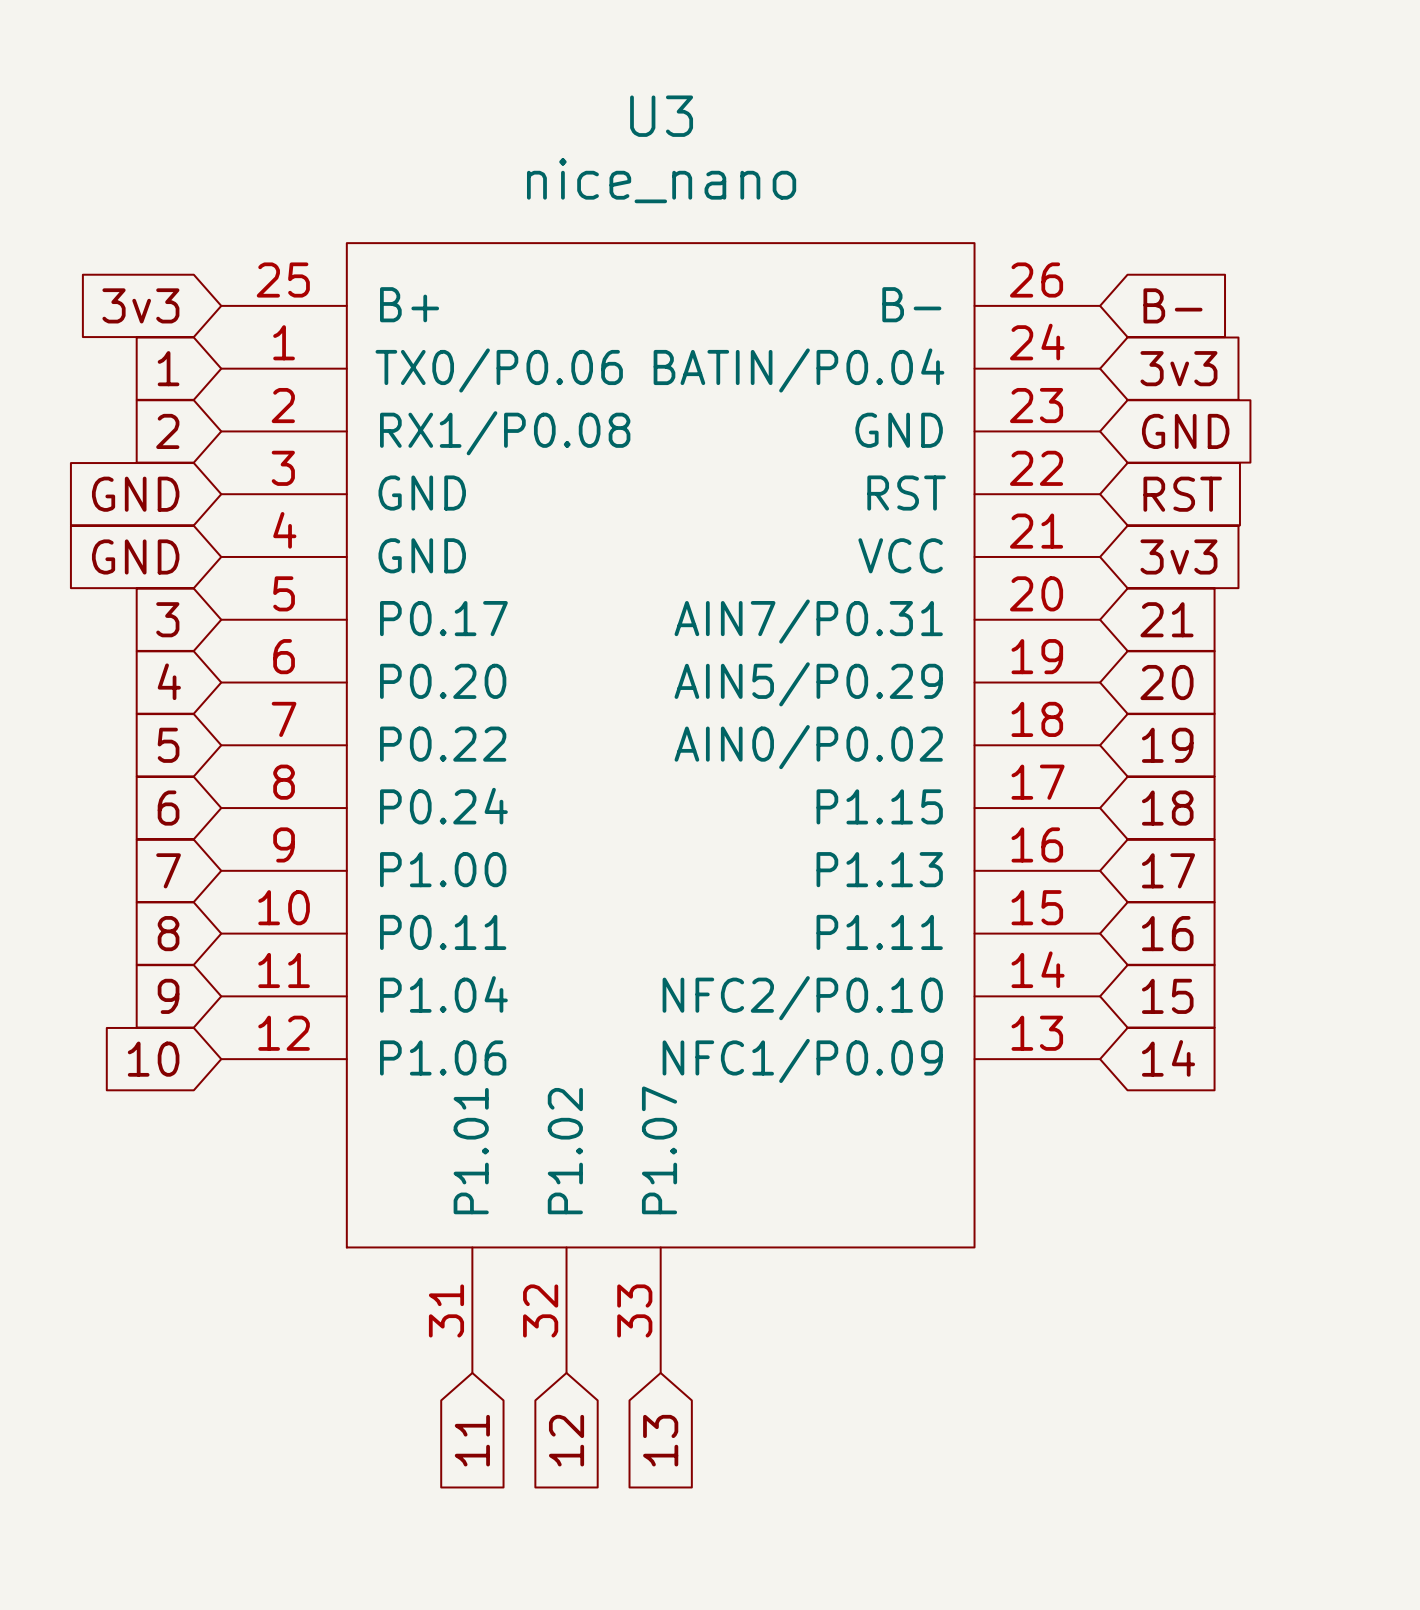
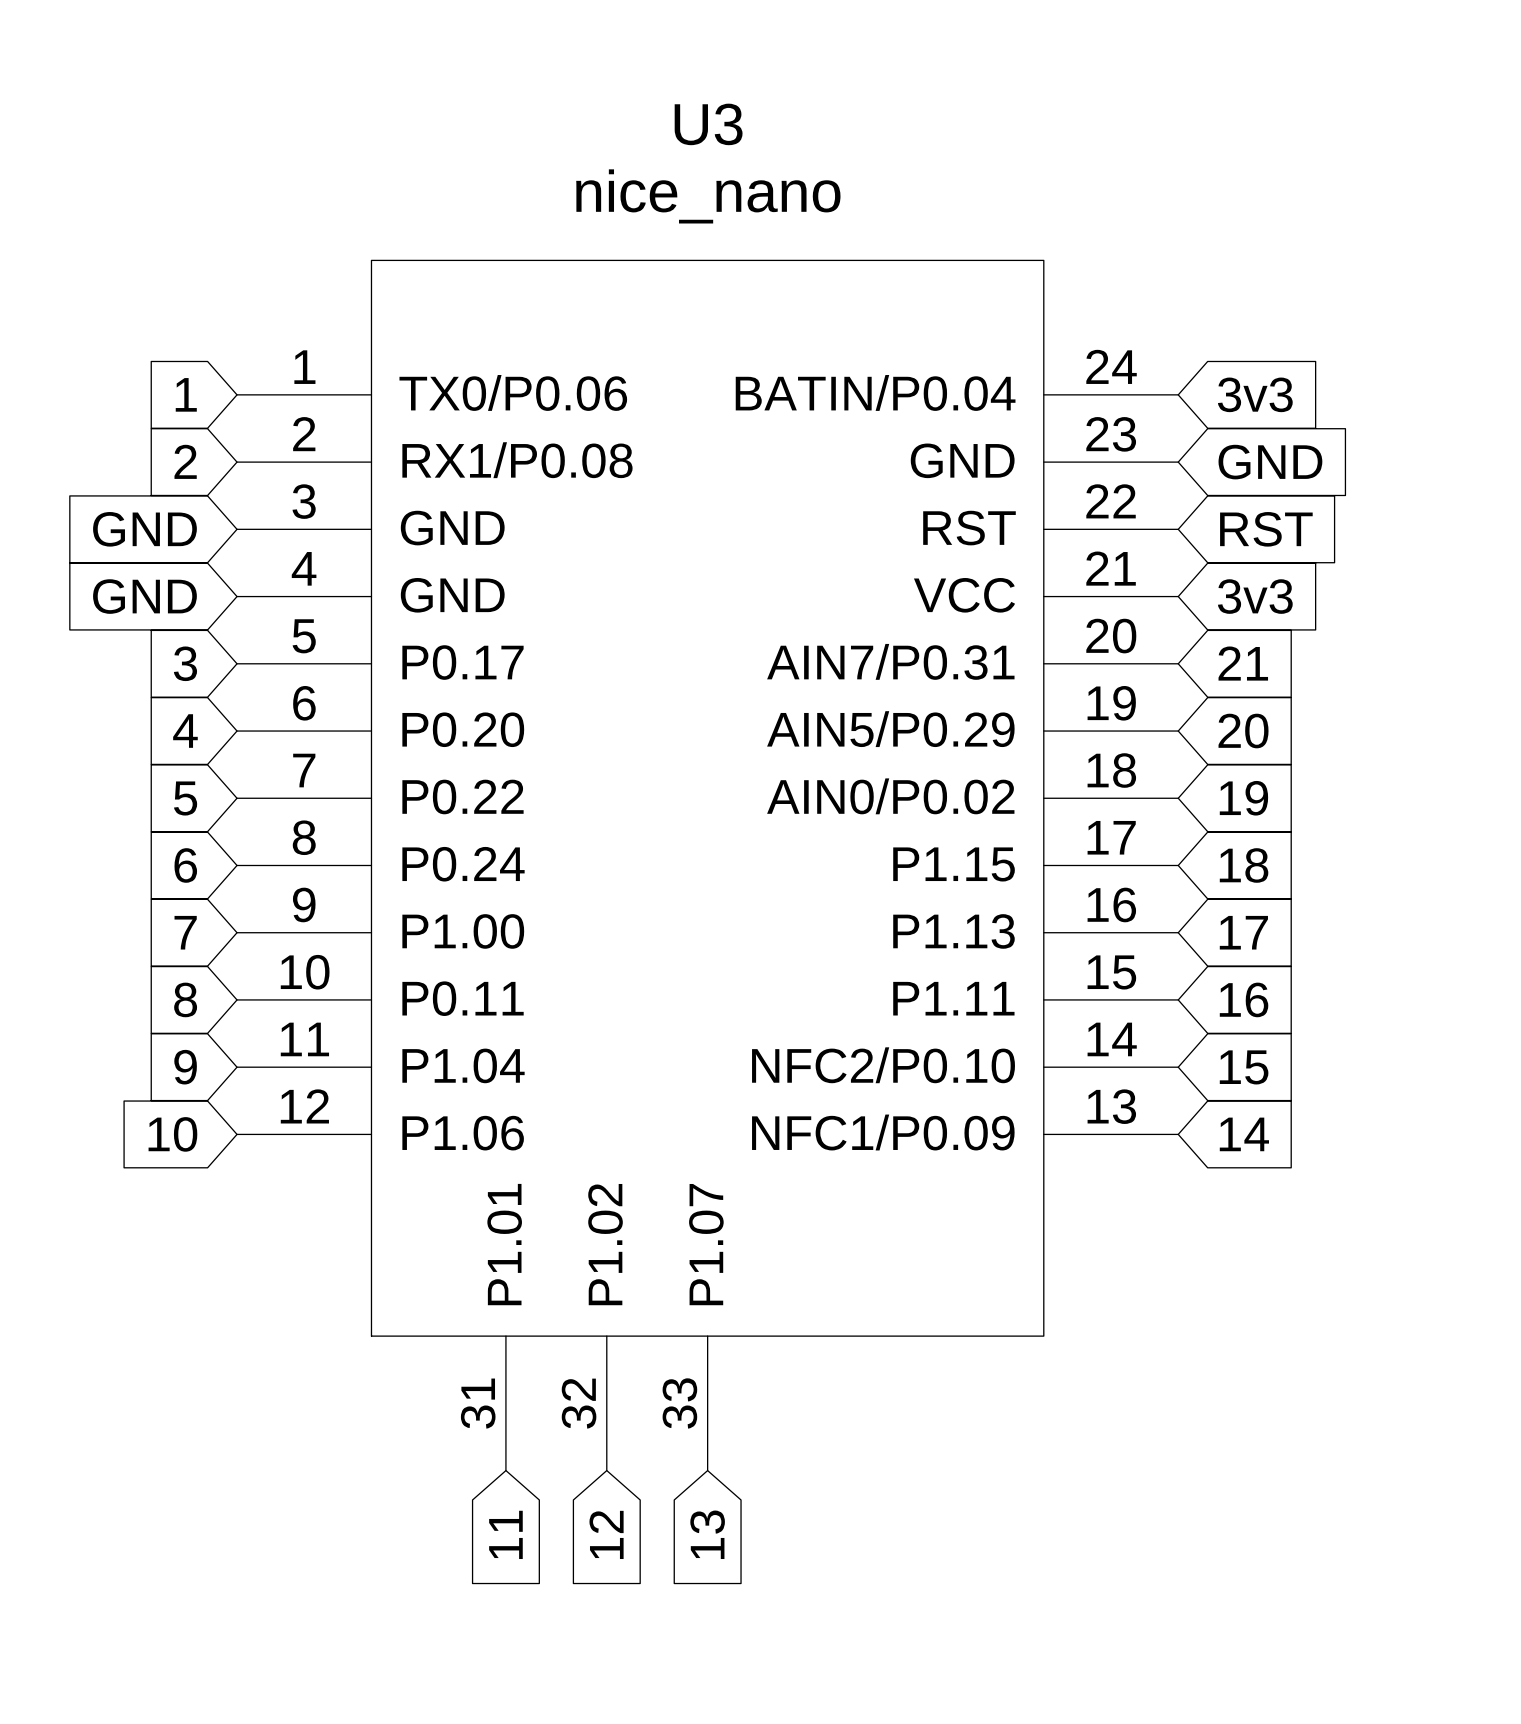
U3 symbol: [221, 243, 1101, 1373] -> [237, 260, 1179, 1471]
global label: 3v3 (140, 305) -> none
global label: B- (1172, 305) -> none

